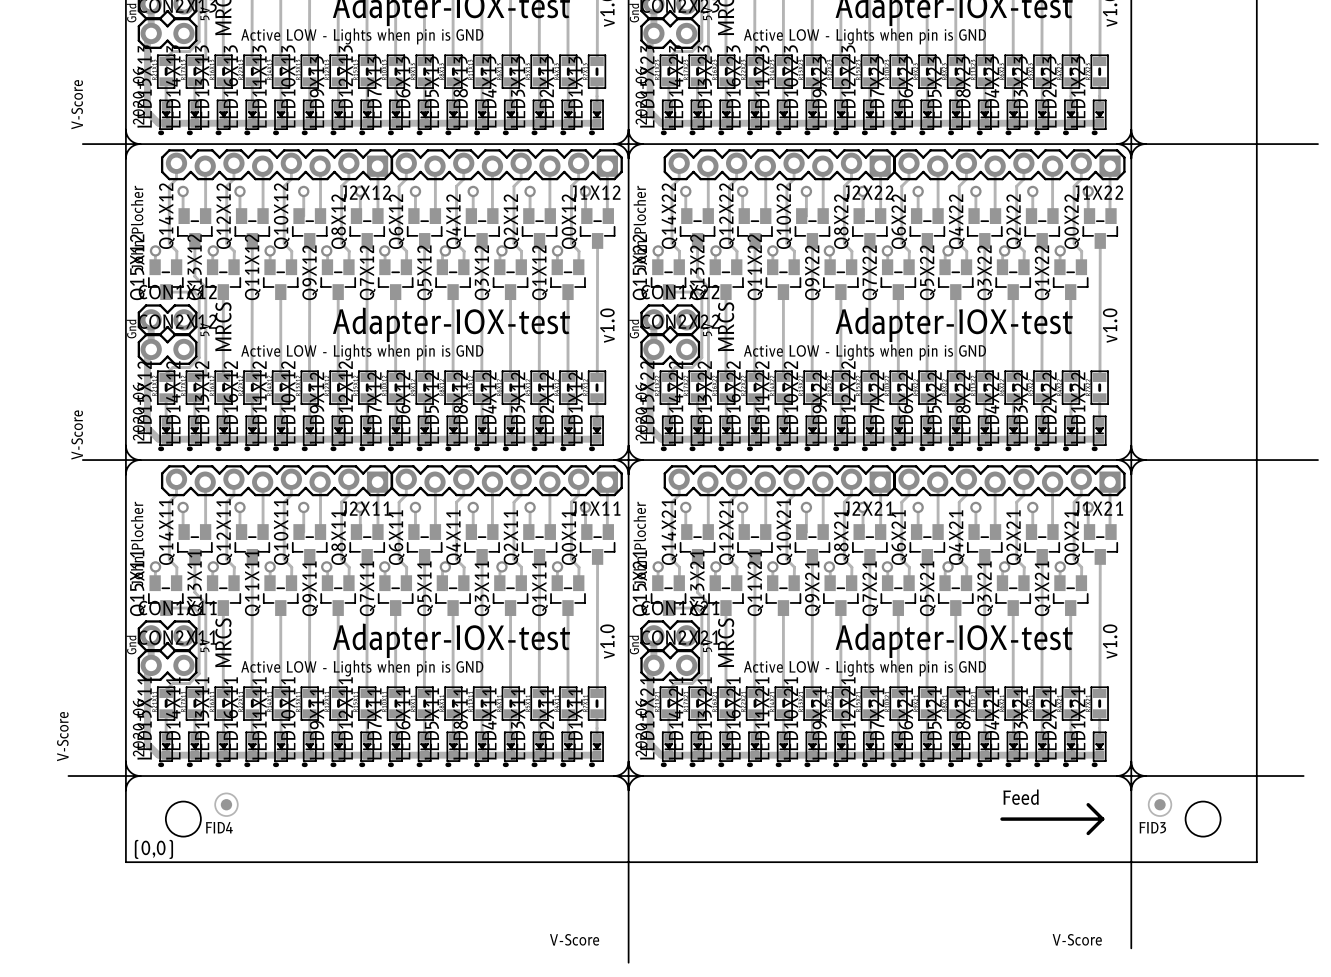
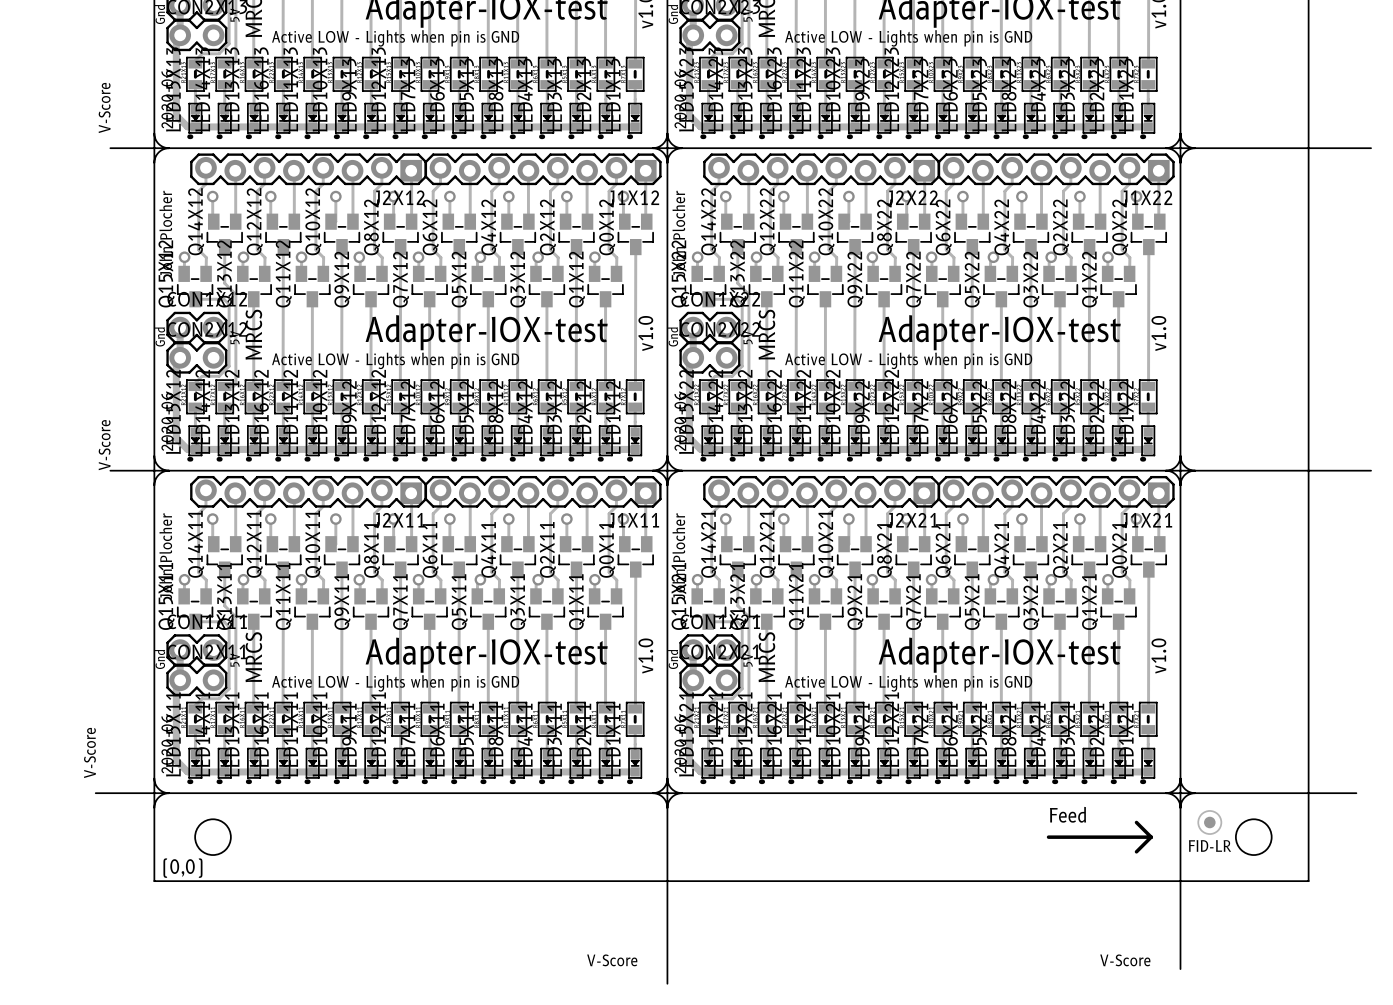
FID4: (226, 804) -> none
FID3 name: FID3 (1152, 827) -> FID-LR (1210, 845)

